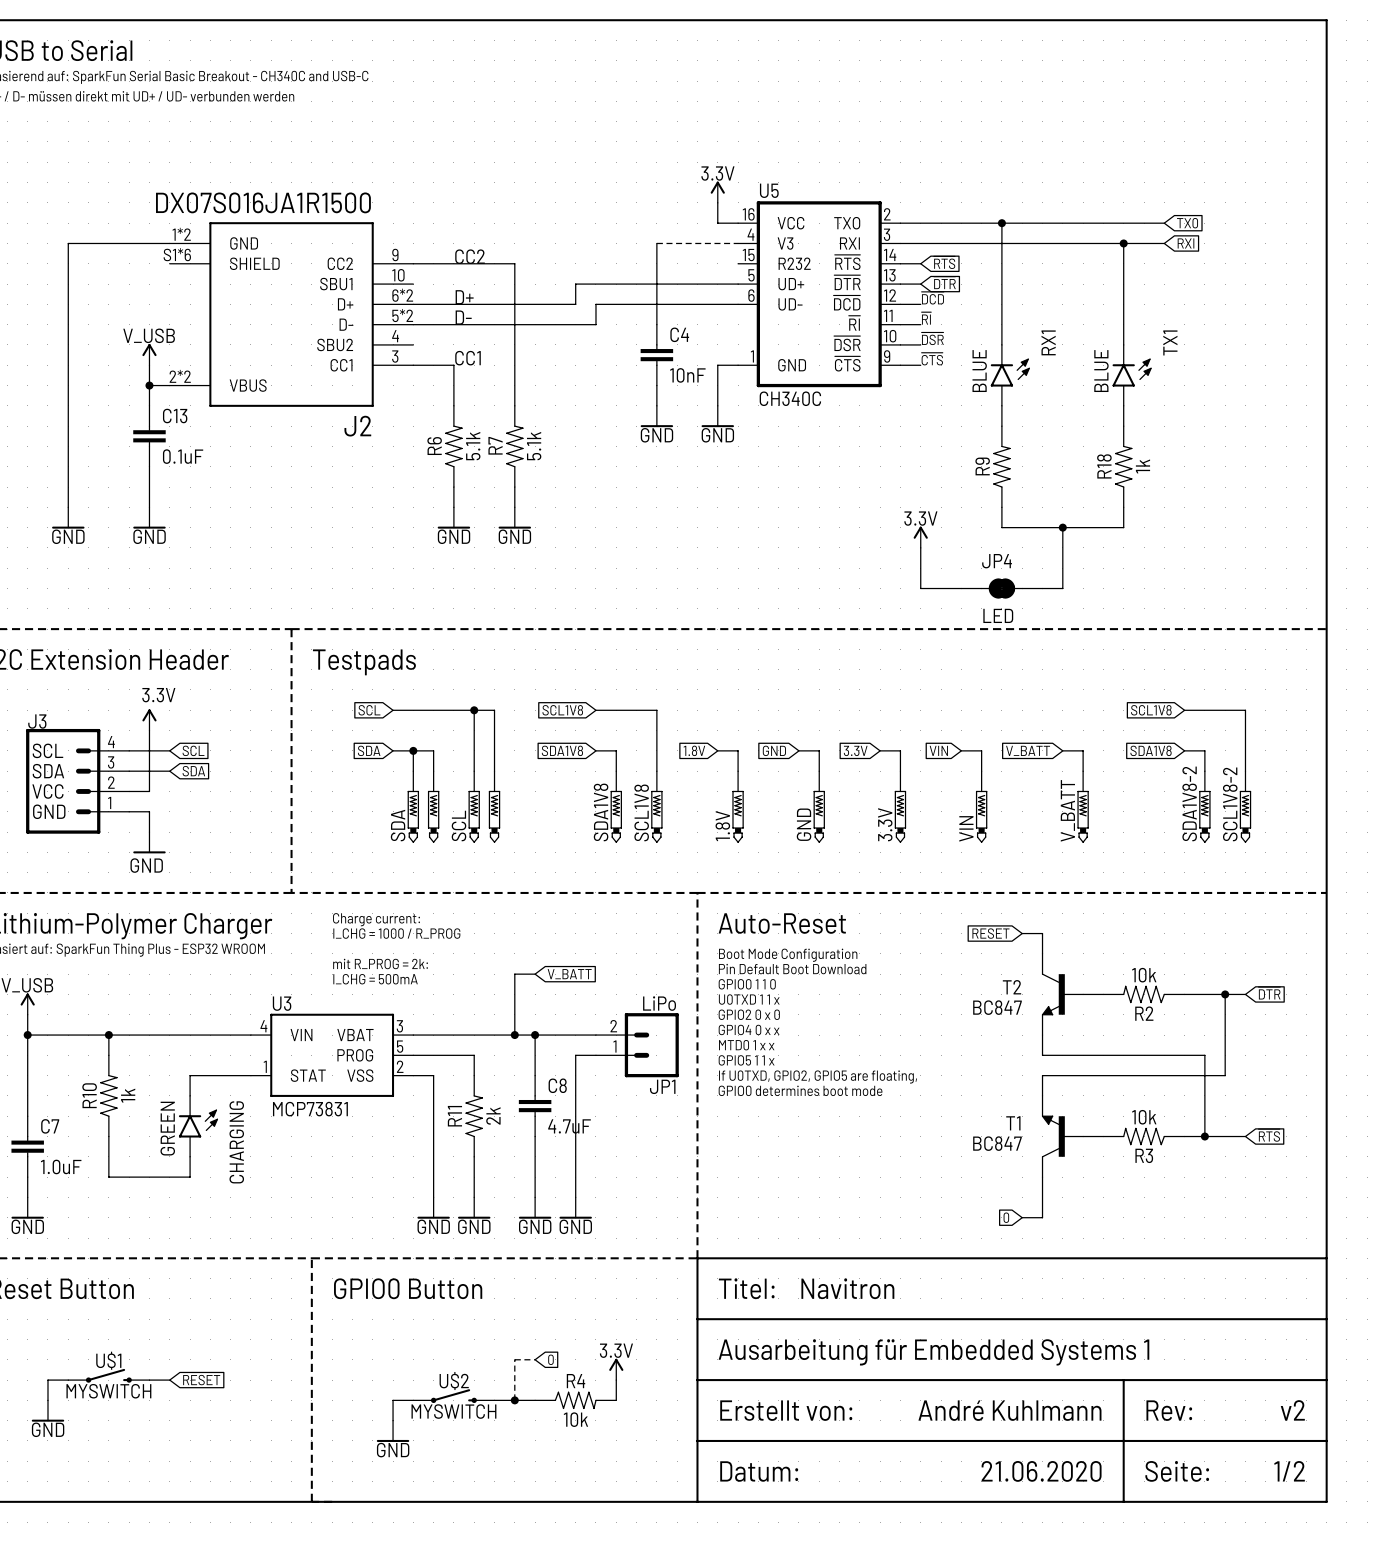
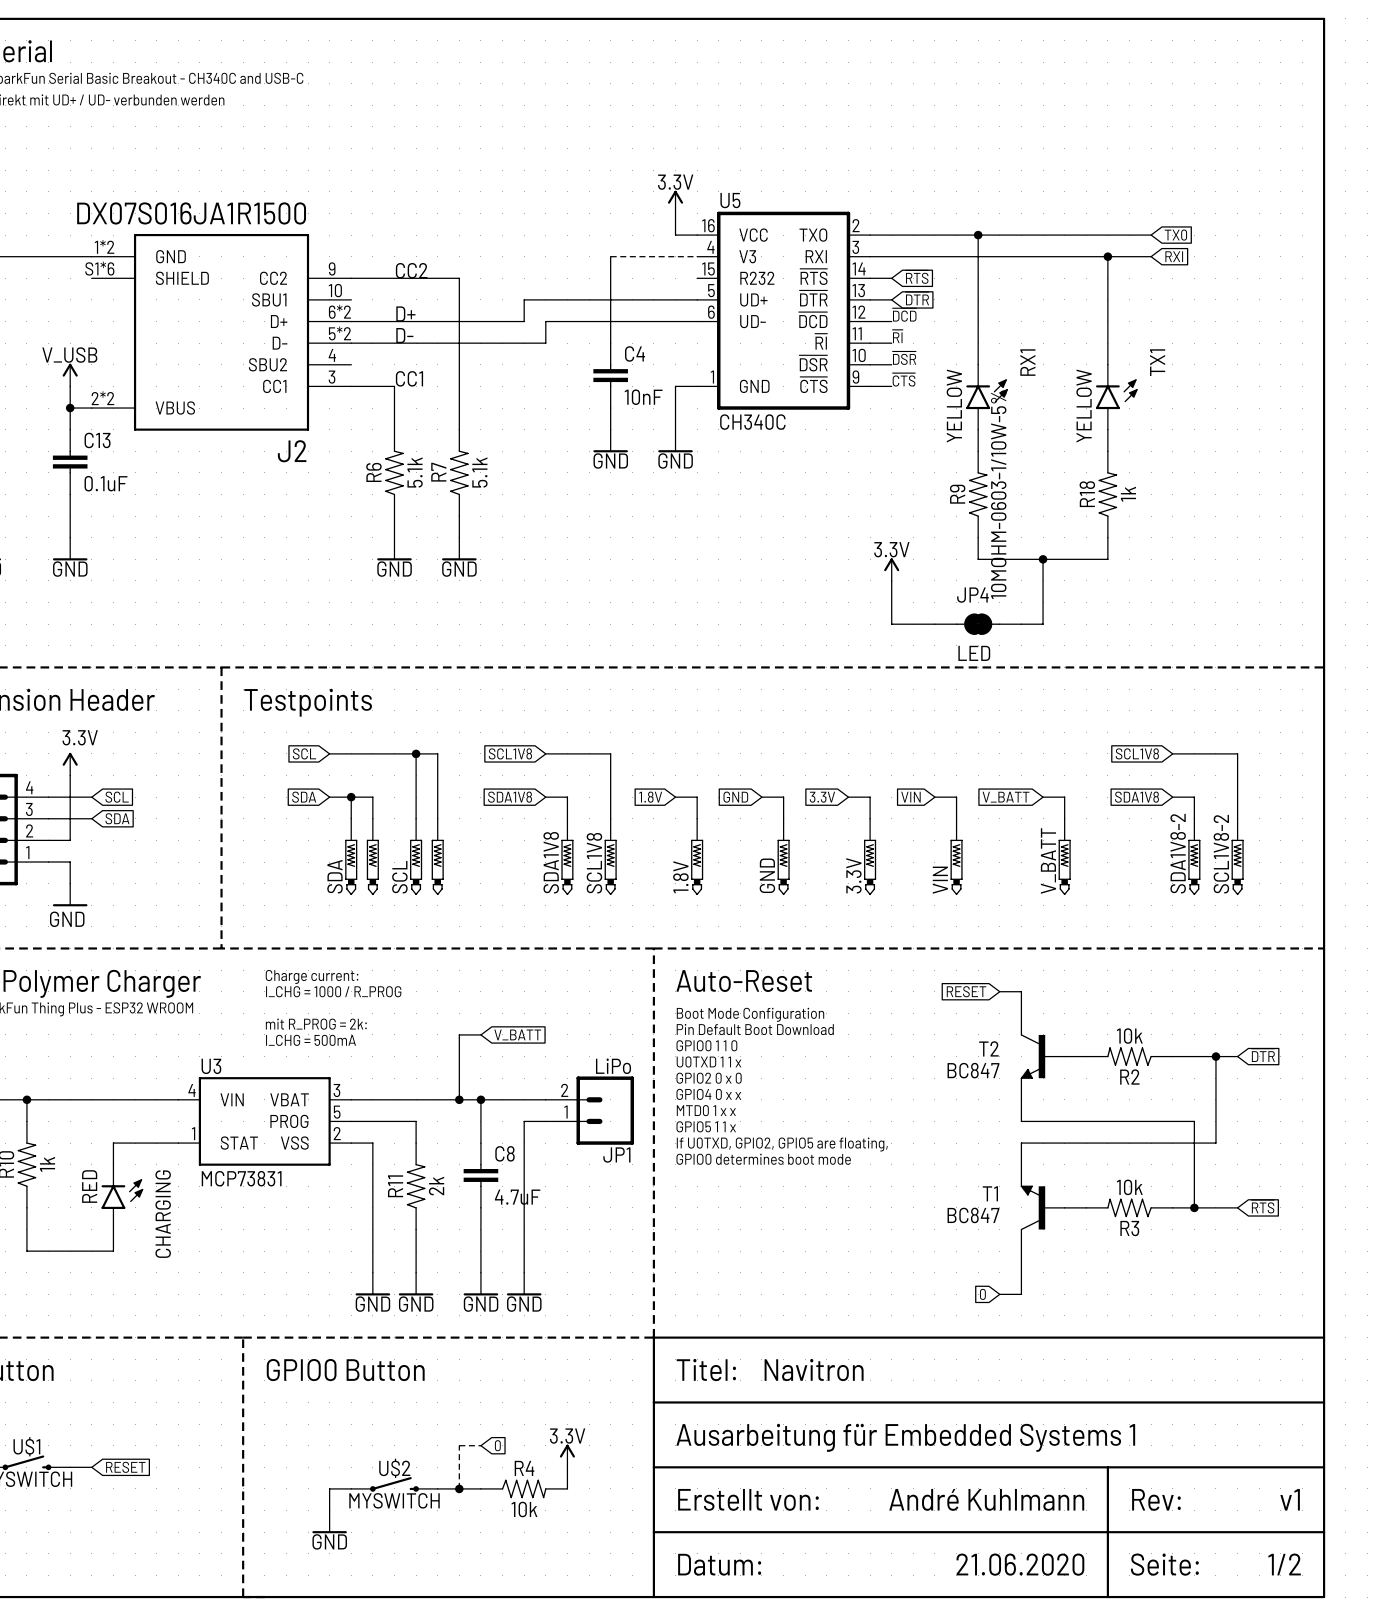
RX1 value: BLUE (979, 371) -> YELLOW (954, 406)
TX1 value: BLUE (1101, 371) -> YELLOW (1084, 406)
R9 value: none -> 10MOHM-0603-1/10W-5% (998, 494)
text: Testpads (364, 662) -> Testpoints (308, 702)
CHARGING value: GREEN (167, 1128) -> RED (89, 1186)
text: v2 (1292, 1410) -> v1 (1290, 1499)

